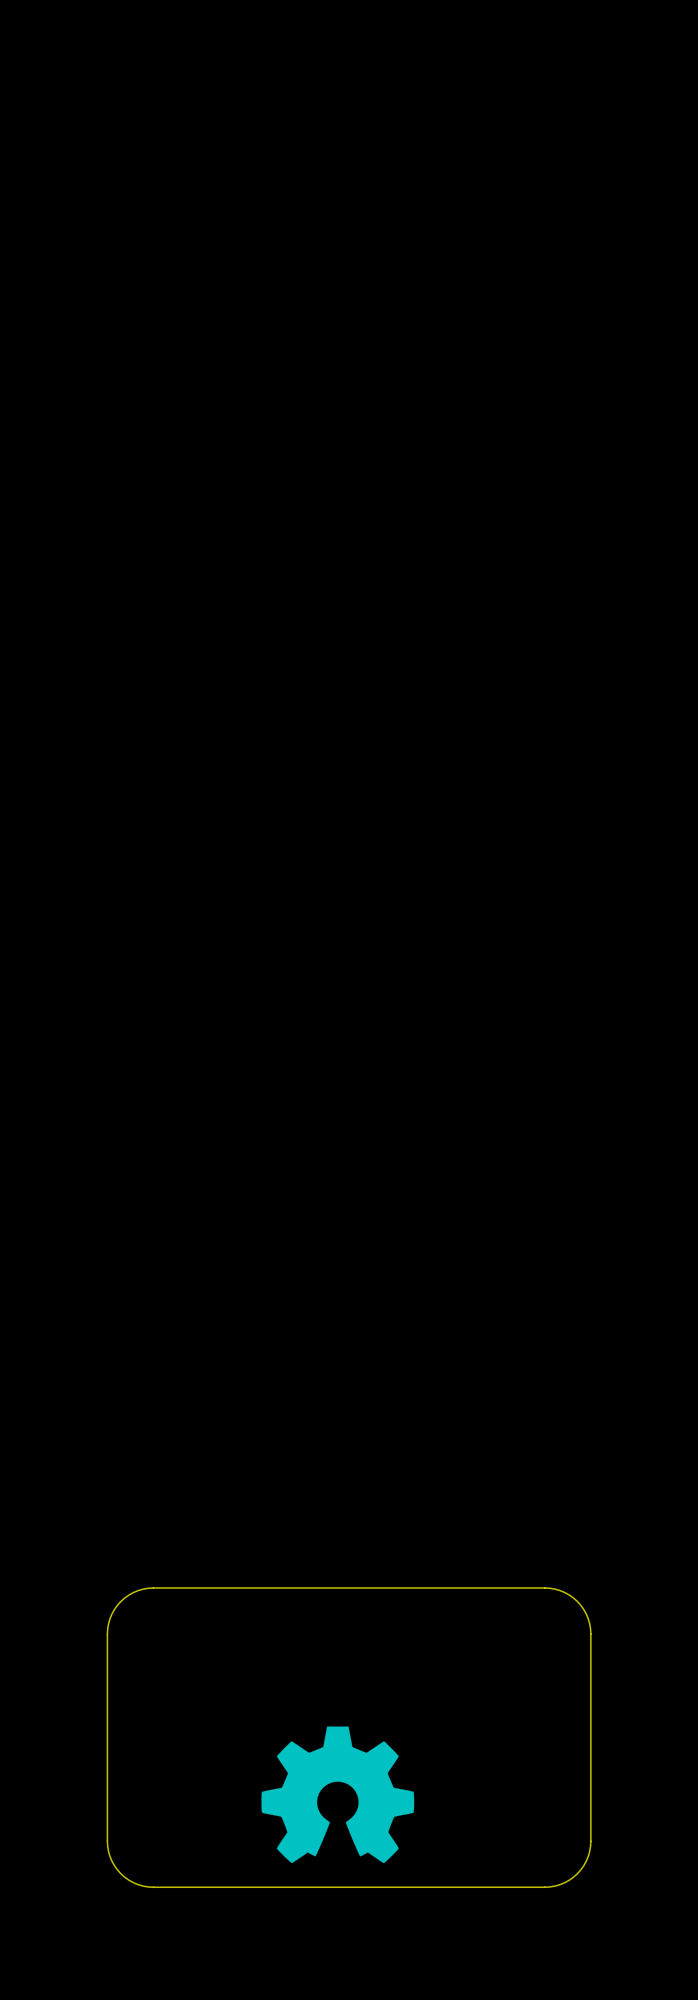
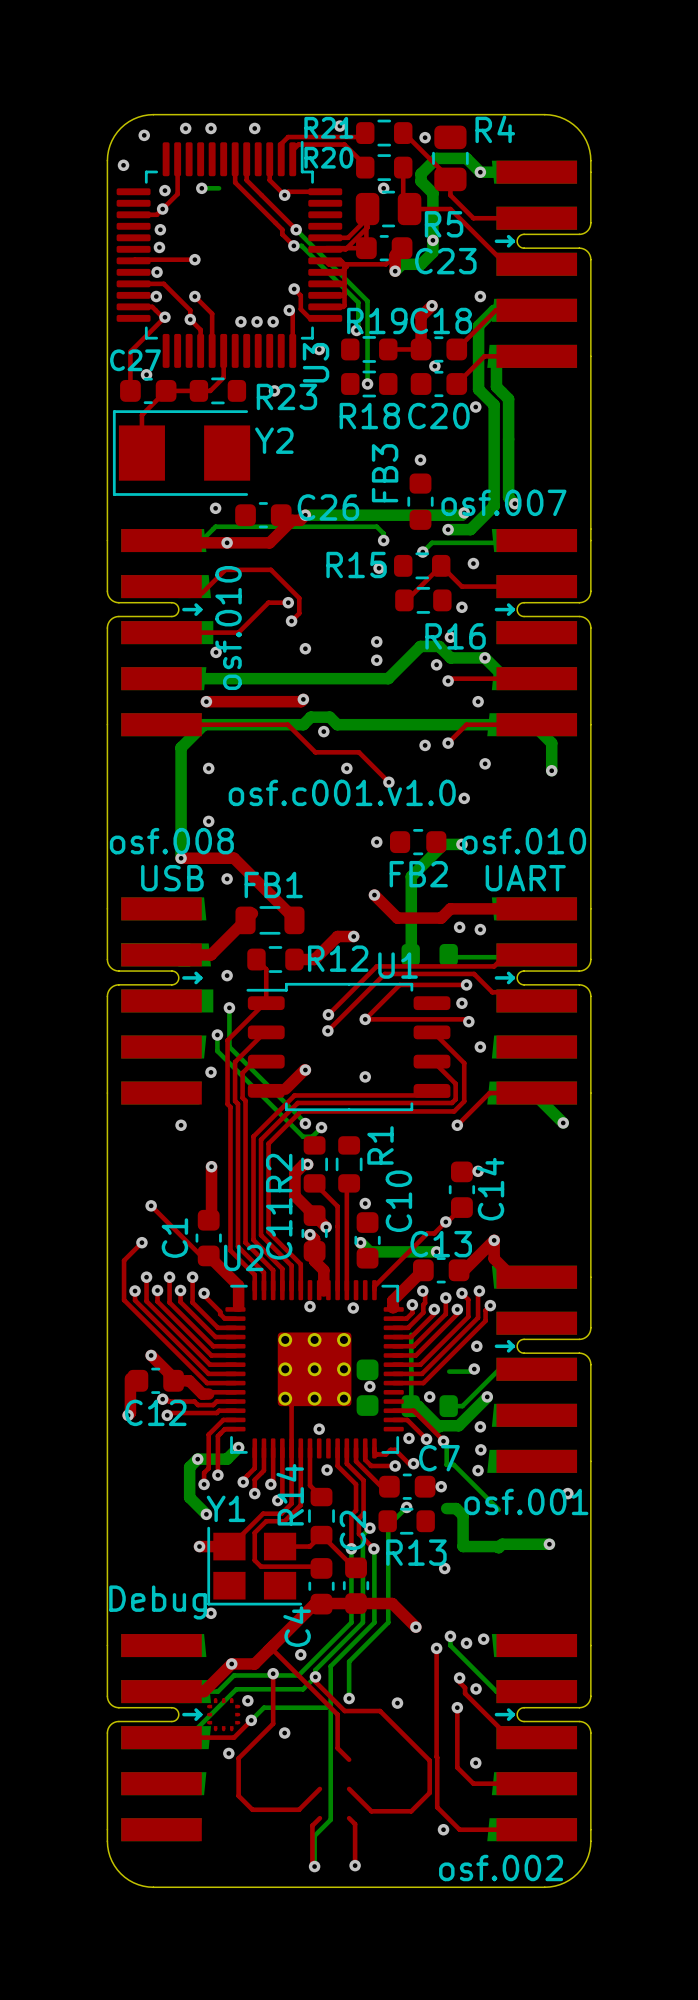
via: none -> (339, 126)
via: none -> (185, 128)
via: none -> (211, 128)
via: none -> (254, 128)
top track: none -> (365, 133) (361, 137) (288, 137) (281, 143) (281, 159)
R21: none -> (384, 133)
top track: none -> (403, 133) (450, 179) (450, 195) (473, 218) (536, 218)
via: none -> (144, 135)
via: none -> (425, 137)
R4: none -> (450, 158)
top track: none -> (177, 159) (177, 194) (156, 214) (133, 214)
top track: none -> (235, 159) (235, 182) (282, 229) (282, 234) (293, 245)
top track: none -> (246, 159) (246, 180) (296, 229)
top track: none -> (269, 159) (269, 180) (284, 195) (288, 191) (325, 191)
top track: none -> (292, 159) (292, 150) (298, 144) (344, 144) (365, 165) (365, 167)
via: none -> (123, 165)
R20: none -> (384, 167)
top track: none -> (403, 167) (403, 202) (409, 209) (450, 209) (505, 264) (536, 264)
via: none -> (480, 172)
bottom track: none -> (535, 172) (480, 172) (466, 158) (436, 158) (421, 173) (421, 181) (432, 193) (432, 252) (421, 264) (402, 264) (395, 271)
board edge: none -> (590, 172) (589, 150) (580, 131) (564, 119) (549, 114) (153, 114) (138, 117) (124, 124) (111, 140) (107, 160) (107, 540)
bottom track: none -> (201, 188) (219, 188)
via: none -> (201, 188)
via: none -> (383, 188)
via: none -> (164, 190)
via: none -> (284, 195)
via: none -> (162, 209)
top track: none -> (367, 209) (367, 227) (345, 249) (325, 249) (326, 248) (366, 248) (366, 210)
R5: none -> (388, 209)
top track: none -> (367, 218) (347, 237) (325, 237)
via: none -> (160, 229)
bottom track: none -> (296, 229) (367, 301) (367, 383)
via: none -> (296, 229)
via: none -> (432, 240)
bottom track: none -> (293, 245) (301, 245) (358, 302) (358, 328) (356, 330)
via: none -> (293, 245)
via: none -> (159, 247)
C23: none -> (384, 248)
U3: none -> (229, 254)
top track: none -> (194, 259) (133, 260)
via: none -> (194, 259)
top track: none -> (344, 264) (344, 305) (325, 306)
part: none -> (539, 264)
top track: none -> (395, 271) (395, 255) (402, 248) (385, 264) (328, 264) (325, 260) (341, 260) (346, 266) (341, 272) (325, 272)
via: none -> (395, 271)
via: none -> (157, 272)
top track: none -> (133, 283) (163, 283) (190, 310) (190, 319) (200, 329) (200, 350)
top track: none -> (294, 289) (300, 295) (300, 309) (309, 318) (325, 318)
via: none -> (294, 289)
via: none -> (156, 296)
top track: none -> (194, 296) (212, 313) (212, 350)
via: none -> (194, 296)
via: none -> (480, 296)
top track: none -> (432, 305) (421, 316) (421, 349) (388, 349)
via: none -> (432, 305)
top track: none -> (133, 306) (152, 306) (164, 317) (130, 351) (130, 390)
top track: none -> (289, 310) (292, 313) (292, 350)
via: none -> (289, 310)
bottom track: none -> (535, 310) (494, 310) (478, 325) (478, 389) (494, 405) (494, 506) (470, 529) (448, 529)
top track: none -> (536, 310) (495, 310) (456, 349)
via: none -> (164, 317)
via: none -> (190, 319)
via: none -> (240, 321)
via: none -> (257, 321)
via: none -> (273, 321)
via: none -> (356, 330)
via: none -> (319, 349)
R19: none -> (369, 349)
C18: none -> (438, 349)
top track: none -> (223, 350) (223, 377) (210, 390) (166, 390) (141, 415) (141, 453)
bottom track: none -> (533, 356) (505, 356) (496, 365) (496, 386) (508, 399) (508, 497) (514, 503)
top track: none -> (536, 356) (484, 356) (456, 383)
board edge: none -> (590, 356) (590, 540)
via: none -> (434, 366)
via: none -> (146, 374)
via: none -> (367, 383)
R18: none -> (369, 383)
C20: none -> (438, 383)
C27: none -> (148, 390)
R23: none -> (217, 390)
via: none -> (274, 390)
via: none -> (475, 407)
Y2: none -> (181, 453)
via: none -> (420, 459)
FB3: none -> (420, 501)
text: none -> osf.007 (503, 502)
via: none -> (514, 503)
via: none -> (215, 508)
bottom track: none -> (464, 512) (461, 515) (305, 515)
via: none -> (464, 512)
C26: none -> (263, 515)
top track: none -> (305, 515) (300, 520) (292, 520) (269, 542) (163, 542) (161, 540)
via: none -> (305, 515)
via: none -> (448, 529)
bottom track: none -> (162, 540) (201, 540) (215, 526) (376, 526) (383, 533) (383, 540)
via: none -> (383, 540)
bottom track: none -> (535, 540) (533, 542) (432, 542) (422, 552)
via: none -> (227, 542)
via: none -> (422, 552)
via: none -> (473, 563)
R15: none -> (422, 565)
via: none -> (379, 568)
top track: none -> (536, 586) (461, 586) (441, 565) (406, 600) (404, 600)
top track: none -> (201, 593) (225, 569) (270, 569) (299, 598) (299, 613) (291, 621)
R16: none -> (423, 600)
top track: none -> (288, 602) (268, 602) (238, 632) (161, 632)
via: none -> (288, 602)
via: none -> (461, 607)
via: none -> (291, 621)
text: none -> osf.010 (228, 628)
part: none -> (160, 632)
part: none -> (539, 632)
via: none -> (450, 637)
via: none -> (376, 641)
via: none -> (305, 648)
via: none -> (216, 652)
via: none -> (484, 657)
via: none -> (376, 660)
via: none -> (436, 664)
bottom track: none -> (162, 678) (388, 678) (420, 646) (439, 646) (450, 657) (484, 657) (505, 678) (535, 678)
top track: none -> (536, 678) (450, 678) (448, 680)
via: none -> (448, 680)
top track: none -> (303, 699) (301, 701) (206, 701)
via: none -> (303, 699)
via: none -> (206, 701)
via: none -> (478, 701)
board edge: none -> (107, 724) (107, 908)
bottom track: none -> (160, 724) (303, 724) (310, 717) (329, 717) (337, 724) (533, 724) (551, 743) (551, 770)
top track: none -> (161, 724) (287, 724) (315, 752) (358, 752) (388, 782)
bottom track: none -> (204, 724) (181, 747) (181, 858)
top track: none -> (536, 724) (466, 724) (448, 743)
board edge: none -> (590, 724) (590, 908)
via: none -> (323, 731)
via: none -> (448, 743)
via: none -> (425, 745)
via: none -> (485, 763)
via: none -> (208, 768)
via: none -> (346, 768)
via: none -> (551, 770)
via: none -> (388, 782)
text: none -> osf.c001.v1.0 (342, 792)
via: none -> (464, 798)
via: none -> (208, 821)
text: none -> osf.008 (171, 841)
text: none -> osf.010 (524, 841)
via: none -> (376, 842)
FB2: none -> (418, 842)
bottom track: none -> (461, 844) (443, 844) (411, 876) (410, 954)
via: none -> (461, 844)
top track: none -> (181, 858) (234, 858) (294, 920)
via: none -> (181, 858)
text: none -> USB (172, 878)
via: none -> (227, 878)
text: none -> UART (525, 878)
top track: none -> (374, 895) (397, 918) (441, 918) (450, 908) (536, 908)
via: none -> (374, 895)
top track: none -> (252, 913) (211, 954) (161, 954)
FB1: none -> (269, 920)
via: none -> (459, 927)
via: none -> (480, 929)
top track: none -> (353, 936) (337, 936) (314, 959) (294, 959)
via: none -> (353, 936)
part: none -> (429, 954)
bottom track: none -> (448, 954) (451, 957) (534, 957) (536, 954)
top track: none -> (536, 954) (505, 954) (494, 966) (376, 966) (328, 1014)
top track: none -> (256, 959) (266, 969) (266, 1003) (227, 1040) (227, 1104) (230, 1107) (230, 1250) (254, 1274) (254, 1290)
R12: none -> (275, 959)
via: none -> (227, 975)
top track: none -> (466, 984) (399, 984) (365, 1019) (466, 1019) (468, 1021)
via: none -> (466, 984)
part: none -> (160, 1000)
top track: none -> (536, 1000) (528, 992) (492, 992) (474, 973) (384, 973) (327, 1030)
part: none -> (539, 1000)
via: none -> (461, 1003)
bottom track: none -> (229, 1007) (229, 1047) (305, 1123)
via: none -> (229, 1007)
via: none -> (328, 1014)
via: none -> (365, 1019)
via: none -> (468, 1021)
via: none -> (327, 1030)
top track: none -> (266, 1032) (235, 1062) (235, 1101) (238, 1103) (238, 1246) (263, 1272) (263, 1290)
top track: none -> (432, 1032) (464, 1063) (464, 1101) (454, 1111) (300, 1111) (268, 1143) (268, 1232) (300, 1264) (300, 1290)
bottom track: none -> (217, 1035) (217, 1051) (303, 1136) (312, 1136) (321, 1127)
via: none -> (217, 1035)
U1: none -> (348, 1047)
via: none -> (480, 1047)
top track: none -> (266, 1061) (253, 1061) (242, 1072) (242, 1097) (245, 1100) (245, 1242) (273, 1270) (273, 1290)
top track: none -> (432, 1061) (455, 1083) (455, 1099) (451, 1102) (297, 1102) (261, 1139) (261, 1235) (291, 1265) (291, 1290)
top track: none -> (305, 1070) (285, 1089)
via: none -> (305, 1070)
via: none -> (211, 1072)
via: none -> (365, 1076)
board edge: none -> (107, 1093) (107, 1634)
bottom track: none -> (533, 1093) (563, 1122)
top track: none -> (536, 1093) (489, 1093) (457, 1125)
top track: none -> (448, 1095) (294, 1095) (253, 1136) (253, 1240) (282, 1268) (282, 1290)
via: none -> (563, 1122)
via: none -> (305, 1123)
via: none -> (181, 1125)
via: none -> (457, 1125)
via: none -> (321, 1127)
top track: none -> (307, 1164) (303, 1164) (294, 1173) (294, 1196) (326, 1227)
via: none -> (307, 1164)
R2: none -> (314, 1164)
R1: none -> (349, 1164)
top track: none -> (211, 1166) (211, 1217) (208, 1220)
via: none -> (211, 1166)
via: none -> (478, 1171)
top track: none -> (314, 1183) (337, 1206) (337, 1290)
top track: none -> (349, 1183) (346, 1185) (346, 1290)
C14: none -> (461, 1189)
via: none -> (365, 1203)
top track: none -> (151, 1205) (201, 1255) (208, 1255) (238, 1285) (238, 1306) (235, 1309)
via: none -> (151, 1205)
top track: none -> (461, 1207) (434, 1233) (427, 1233) (374, 1286) (374, 1290)
via: none -> (445, 1221)
via: none -> (326, 1227)
C11: none -> (314, 1233)
top track: none -> (309, 1234) (314, 1239) (314, 1261) (323, 1270) (323, 1291)
via: none -> (309, 1234)
C1: none -> (208, 1238)
C10: none -> (367, 1240)
via: none -> (494, 1240)
top track: none -> (141, 1242) (124, 1260) (124, 1300) (207, 1383) (235, 1383)
via: none -> (141, 1242)
bottom track: none -> (360, 1242) (369, 1251) (436, 1251)
via: none -> (360, 1242)
via: none -> (436, 1251)
top track: none -> (423, 1270) (392, 1300) (393, 1307)
C13: none -> (441, 1270)
top track: none -> (459, 1270) (464, 1270) (494, 1240) (494, 1258) (512, 1277) (536, 1277)
top track: none -> (146, 1277) (146, 1301) (210, 1364) (235, 1364)
via: none -> (146, 1277)
top track: none -> (169, 1277) (169, 1302) (213, 1346) (235, 1346)
via: none -> (169, 1277)
top track: none -> (192, 1277) (192, 1302) (217, 1327) (235, 1327)
via: none -> (192, 1277)
top track: none -> (157, 1290) (157, 1301) (211, 1355) (235, 1355)
via: none -> (157, 1290)
top track: none -> (180, 1290) (180, 1301) (215, 1337) (235, 1337)
via: none -> (180, 1290)
top track: none -> (135, 1291) (135, 1300) (208, 1373) (235, 1373)
via: none -> (135, 1291)
top track: none -> (422, 1291) (425, 1293) (423, 1312) (408, 1327) (393, 1327)
via: none -> (422, 1291)
top track: none -> (479, 1291) (478, 1317) (421, 1373) (393, 1373)
via: none -> (479, 1291)
top track: none -> (204, 1293) (224, 1318) (235, 1318)
via: none -> (204, 1293)
top track: none -> (461, 1293) (468, 1299) (468, 1316) (420, 1364) (393, 1364)
via: none -> (461, 1293)
top track: none -> (445, 1297) (445, 1314) (413, 1346) (393, 1346)
via: none -> (445, 1297)
top track: none -> (412, 1304) (412, 1312) (406, 1318) (393, 1318)
via: none -> (412, 1304)
top track: none -> (490, 1305) (485, 1310) (485, 1320) (423, 1383) (393, 1383)
via: none -> (490, 1305)
via: none -> (309, 1306)
via: none -> (353, 1308)
top track: none -> (434, 1309) (434, 1314) (411, 1337) (393, 1337)
via: none -> (434, 1309)
top track: none -> (457, 1309) (457, 1314) (415, 1355) (393, 1355)
via: none -> (457, 1309)
bottom track: none -> (411, 1334) (410, 1406) (418, 1406) (438, 1426) (458, 1425) (487, 1397)
via: none -> (476, 1346)
top track: none -> (151, 1355) (173, 1377) (173, 1380) (189, 1380) (202, 1394) (208, 1394)
via: none -> (151, 1355)
U2: none -> (314, 1369)
bottom track: none -> (474, 1369) (471, 1371) (449, 1371)
via: none -> (474, 1369)
bottom track: none -> (536, 1369) (499, 1369) (462, 1406) (448, 1406)
part: none -> (539, 1369)
top track: none -> (130, 1378) (130, 1413) (128, 1415)
C12: none -> (155, 1380)
via: none -> (369, 1386)
part: none -> (367, 1387)
top track: none -> (235, 1392) (211, 1392) (208, 1394)
via: none -> (429, 1396)
via: none -> (487, 1396)
top track: none -> (285, 1398) (291, 1404) (291, 1503) (281, 1513) (263, 1513) (230, 1546) (199, 1546)
top track: none -> (162, 1399) (168, 1401) (194, 1401) (198, 1405) (213, 1405) (216, 1401) (235, 1401)
via: none -> (162, 1399)
part: none -> (429, 1406)
top track: none -> (235, 1410) (219, 1410) (216, 1413) (169, 1413) (167, 1415)
top track: none -> (393, 1410) (413, 1410) (443, 1441)
via: none -> (128, 1415)
via: none -> (167, 1415)
top track: none -> (235, 1419) (223, 1419) (208, 1434) (208, 1468) (204, 1472) (204, 1484)
top track: none -> (393, 1419) (407, 1419) (426, 1439)
via: none -> (480, 1426)
top track: none -> (235, 1429) (224, 1429) (217, 1436) (217, 1475)
via: none -> (319, 1429)
via: none -> (408, 1438)
via: none -> (426, 1439)
bottom track: none -> (443, 1441) (446, 1444) (446, 1464) (453, 1464) (498, 1509)
via: none -> (443, 1441)
bottom track: none -> (238, 1447) (227, 1459) (197, 1459) (189, 1467) (189, 1497) (206, 1514)
via: none -> (238, 1447)
top track: none -> (254, 1448) (254, 1468) (243, 1482)
top track: none -> (263, 1448) (263, 1470) (254, 1479) (254, 1493)
top track: none -> (273, 1448) (273, 1482) (270, 1484)
top track: none -> (282, 1448) (282, 1495) (277, 1500)
top track: none -> (300, 1448) (300, 1505) (284, 1521) (266, 1521) (254, 1532) (254, 1560) (261, 1566) (319, 1566) (321, 1568)
top track: none -> (309, 1448) (309, 1485) (321, 1497)
top track: none -> (337, 1448) (337, 1465) (356, 1484) (356, 1510) (351, 1515) (351, 1548)
top track: none -> (346, 1448) (346, 1463) (363, 1480) (363, 1513) (358, 1518) (358, 1533) (373, 1548)
top track: none -> (356, 1448) (356, 1461) (383, 1489)
top track: none -> (365, 1448) (365, 1459) (371, 1465) (395, 1465)
top track: none -> (374, 1448) (376, 1454) (385, 1454) (390, 1449) (395, 1449) (408, 1463) (413, 1463)
via: none -> (480, 1449)
via: none -> (197, 1459)
via: none -> (413, 1463)
via: none -> (395, 1465)
via: none -> (327, 1470)
via: none -> (478, 1470)
via: none -> (217, 1475)
via: none -> (243, 1482)
via: none -> (204, 1484)
via: none -> (270, 1484)
C7: none -> (407, 1486)
via: none -> (441, 1486)
via: none -> (254, 1493)
via: none -> (567, 1493)
via: none -> (277, 1500)
text: none -> osf.001 (526, 1501)
bottom track: none -> (406, 1507) (388, 1525) (388, 1622) (349, 1661) (349, 1698)
via: none -> (406, 1507)
bottom track: none -> (446, 1508) (456, 1508) (463, 1515) (463, 1546) (498, 1547) (502, 1544) (549, 1544)
via: none -> (206, 1514)
R14: none -> (321, 1516)
R13: none -> (406, 1521)
bottom track: none -> (369, 1528) (362, 1535) (362, 1622) (315, 1670) (315, 1676) (303, 1689) (236, 1689) (187, 1737) (155, 1737)
via: none -> (369, 1528)
via: none -> (549, 1544)
via: none -> (199, 1546)
top track: none -> (280, 1546) (309, 1546) (321, 1535) (356, 1567)
bottom track: none -> (351, 1548) (351, 1622) (298, 1675) (234, 1675) (217, 1691) (155, 1691)
via: none -> (351, 1548)
bottom track: none -> (373, 1548) (374, 1622) (330, 1666) (330, 1819) (314, 1835) (314, 1866)
via: none -> (373, 1548)
Y1: none -> (254, 1566)
via: none -> (444, 1568)
C2: none -> (356, 1585)
C4: none -> (321, 1586)
text: none -> Debug (158, 1602)
via: none -> (211, 1613)
top track: none -> (415, 1627) (392, 1603) (314, 1604) (254, 1663) (231, 1663) (204, 1691) (161, 1691)
via: none -> (415, 1627)
board edge: (107, 1634) (111, 1614) (120, 1601) (133, 1592) (153, 1587) (549, 1588) (564, 1592) (577, 1601) (586, 1614) (590, 1634) -> (590, 1461) (590, 1634)
bottom track: none -> (450, 1636) (450, 1645) (496, 1691) (536, 1691)
via: none -> (450, 1636)
via: none -> (483, 1639)
via: none -> (466, 1643)
board edge: (107, 1645) (107, 1829) -> none
board edge: (590, 1645) (590, 1829) -> (590, 1093) (590, 1277)
top track: none -> (436, 1648) (437, 1807) (459, 1829) (536, 1829)
via: none -> (436, 1648)
top track: none -> (268, 1650) (273, 1650) (337, 1714) (337, 1748) (349, 1759)
via: none -> (300, 1654)
via: none -> (231, 1663)
top track: none -> (273, 1673) (273, 1723) (238, 1758) (238, 1795) (252, 1809) (299, 1809) (319, 1788)
via: none -> (273, 1673)
top track: none -> (315, 1676) (315, 1681) (344, 1711) (380, 1711) (429, 1760) (429, 1792) (411, 1811) (371, 1811) (349, 1788)
via: none -> (315, 1676)
top track: none -> (459, 1678) (459, 1682) (465, 1687) (465, 1693) (509, 1737) (536, 1737)
via: none -> (459, 1678)
via: none -> (476, 1688)
via: none -> (349, 1698)
via: none -> (247, 1700)
bottom track: none -> (330, 1703) (326, 1707) (263, 1707) (251, 1720)
via: none -> (397, 1703)
top track: none -> (457, 1707) (457, 1767) (473, 1783) (536, 1783)
via: none -> (457, 1707)
top track: none -> (251, 1720) (234, 1737) (161, 1737)
via: none -> (251, 1720)
drawing: [261, 1726, 415, 1864] -> none
via: none -> (284, 1733)
part: none -> (173, 1737)
part: none -> (539, 1737)
via: none -> (228, 1753)
via: none -> (475, 1762)
top track: none -> (319, 1818) (312, 1825) (312, 1864) (314, 1866)
top track: none -> (349, 1818) (355, 1824) (355, 1865)
via: none -> (443, 1829)
via: none -> (355, 1865)
via: none -> (314, 1866)
text: none -> osf.002 (501, 1867)

